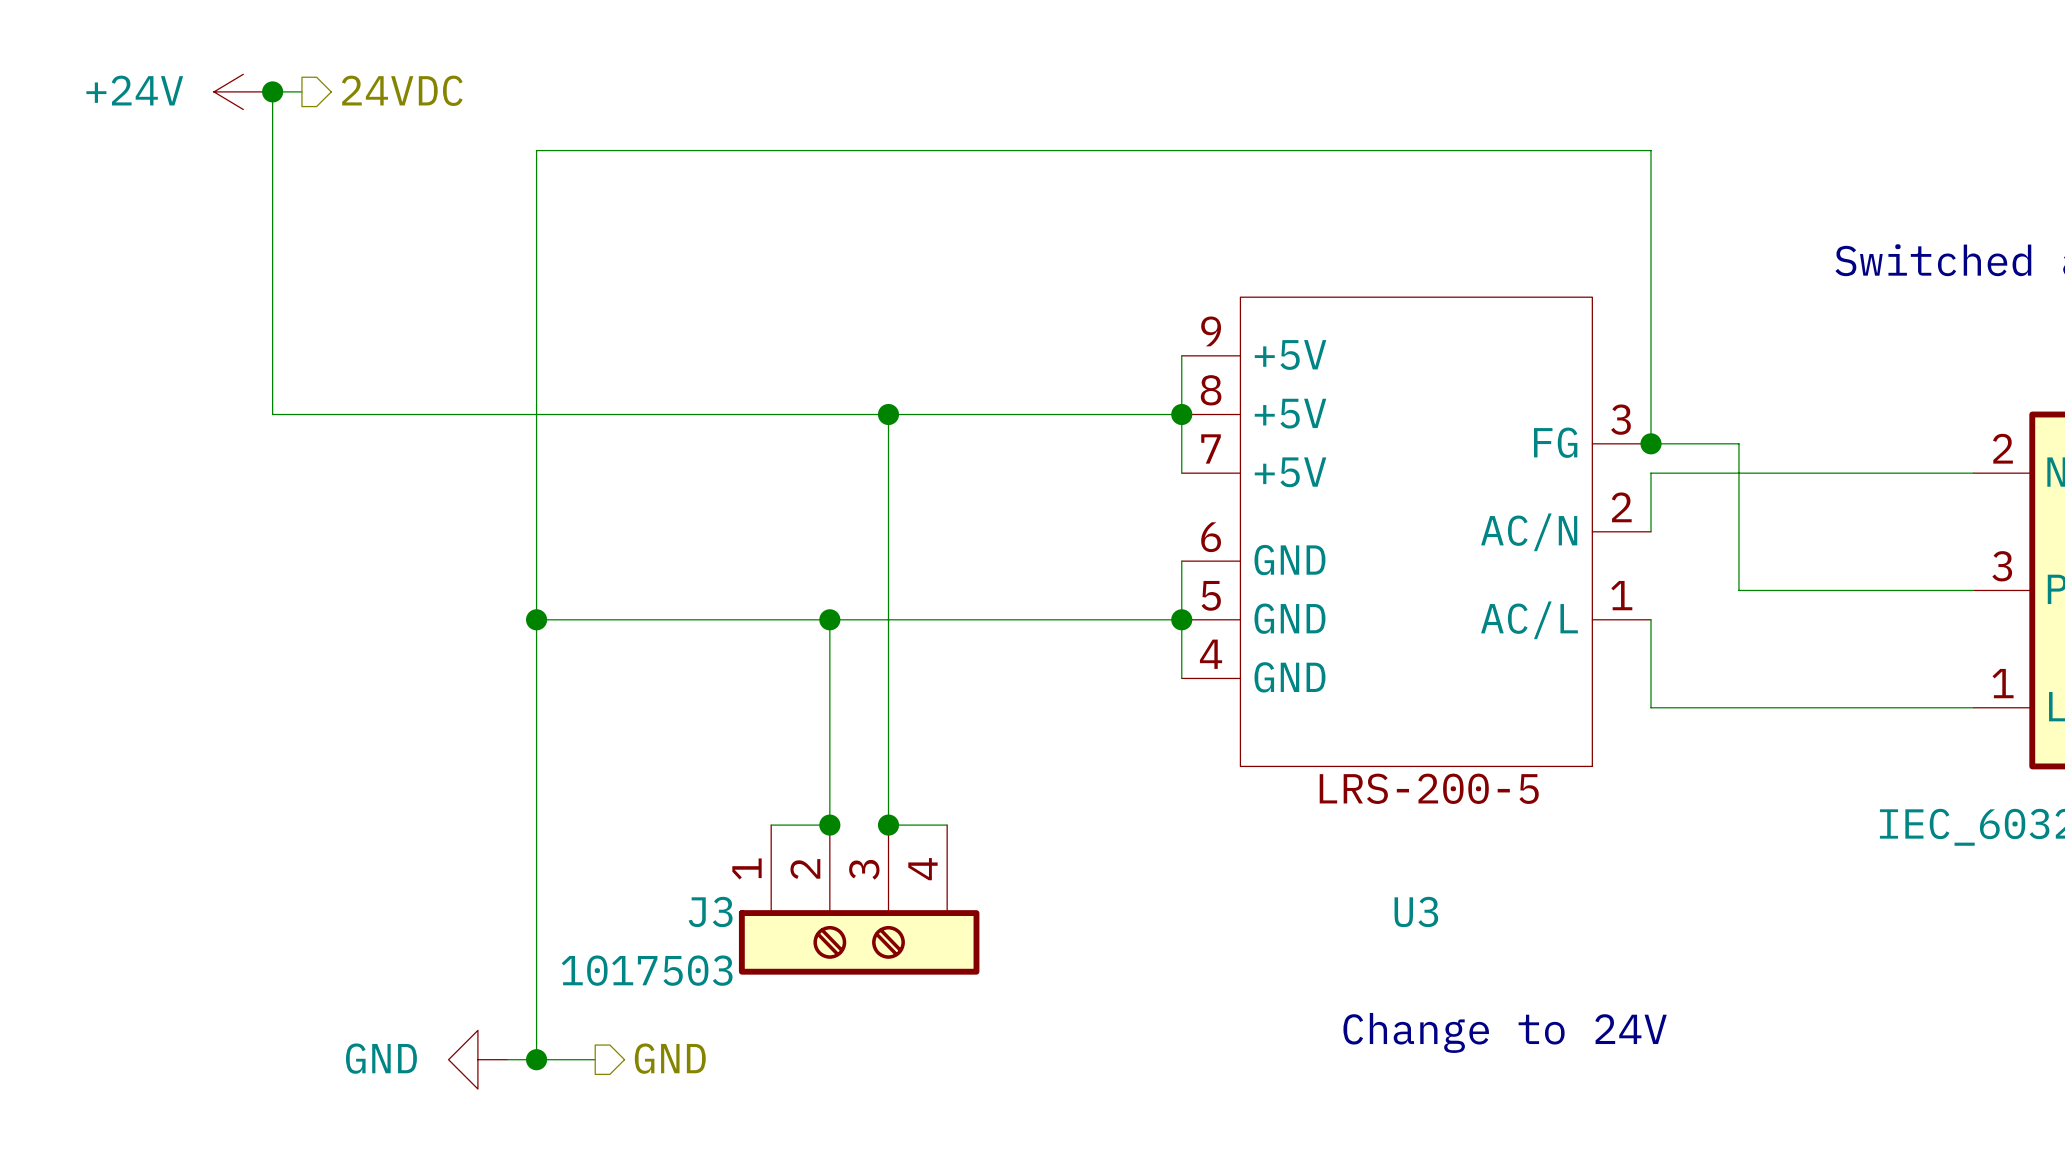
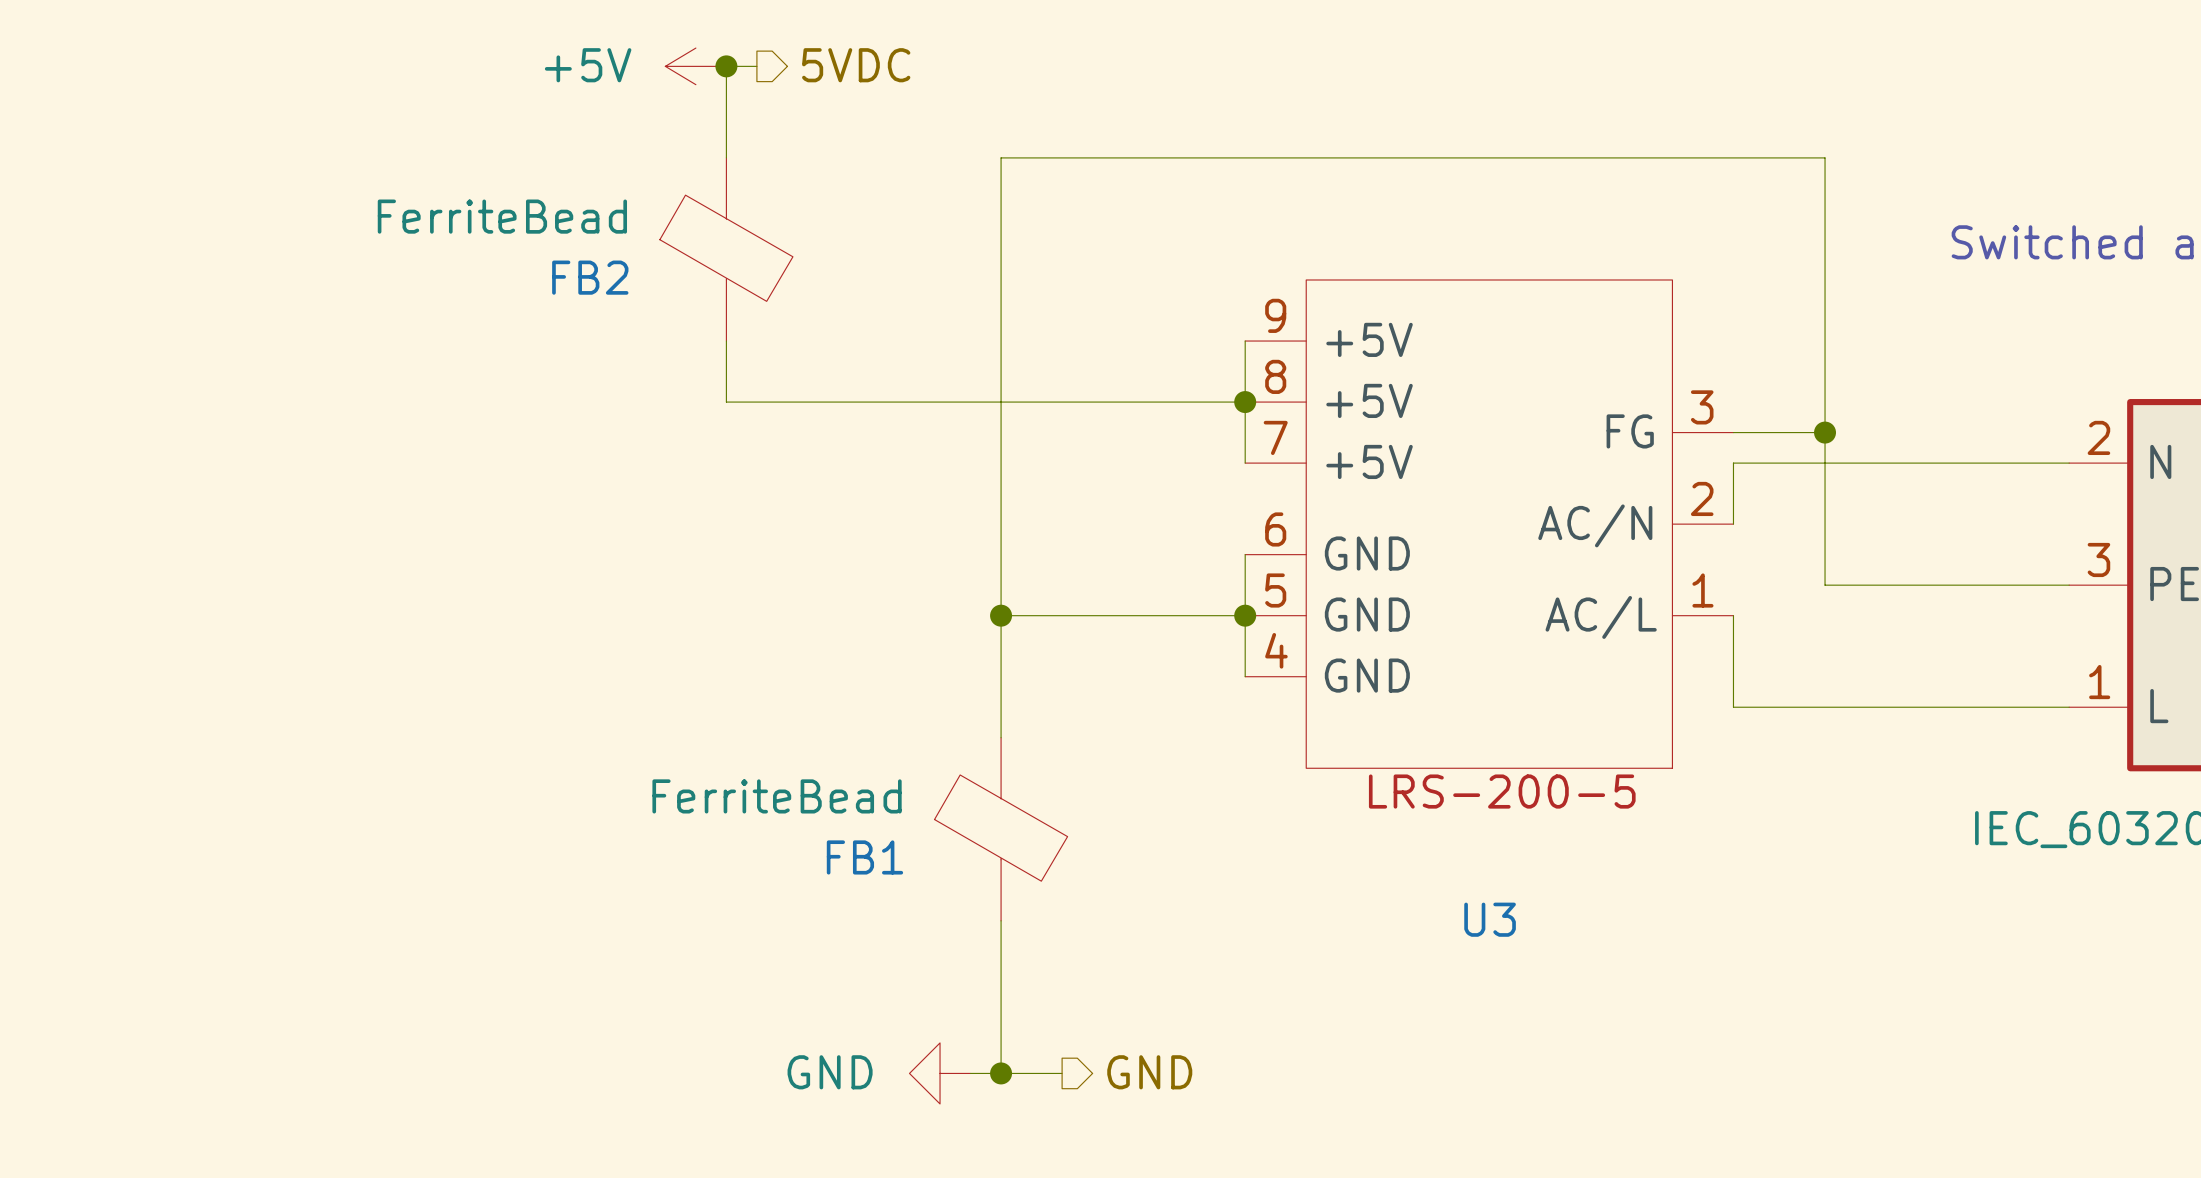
hierarchical label: 24VDC (402, 90) -> none
hierarchical label: none -> 5VDC (856, 65)
power symbol: +24V (243, 91) -> none
junction: (272, 91) -> none
wire: (301, 91) (272, 91) (272, 414) (683, 414) -> (726, 341) (726, 402)
power symbol: none -> +5V (695, 66)
junction: none -> (726, 66)
wire: none -> (756, 66) (726, 66) (726, 157)
FB2: none -> FerriteBead (726, 249)
wire: (888, 414) (888, 825) (947, 825) -> none
junction: (888, 414) -> none
wire: (1651, 443) (1651, 150) (536, 150) (536, 1059) -> none
junction position: (1651, 443) -> (1825, 432)
wire: none -> (1825, 432) (1825, 157) (1001, 157) (1001, 737)
wire: (536, 619) (947, 619) -> none
junction: (536, 619) -> none
wire: (829, 619) (829, 825) (771, 825) -> none
junction: (829, 619) -> none
junction: none -> (1001, 615)
junction: (829, 825) -> none
junction: (888, 825) -> none
FB1: none -> FerriteBead (1001, 829)
J3: 1017503 (859, 899) -> none
wire: none -> (1001, 920) (1001, 1073)
text: Change to 24V (1505, 1032) -> none
hierarchical label position: GND (670, 1058) -> GND (1149, 1072)
power symbol position: GND (477, 1059) -> GND (940, 1073)
wire: (507, 1059) (595, 1059) -> (970, 1073) (1062, 1073)
junction: (536, 1059) -> none
junction: none -> (1001, 1073)

